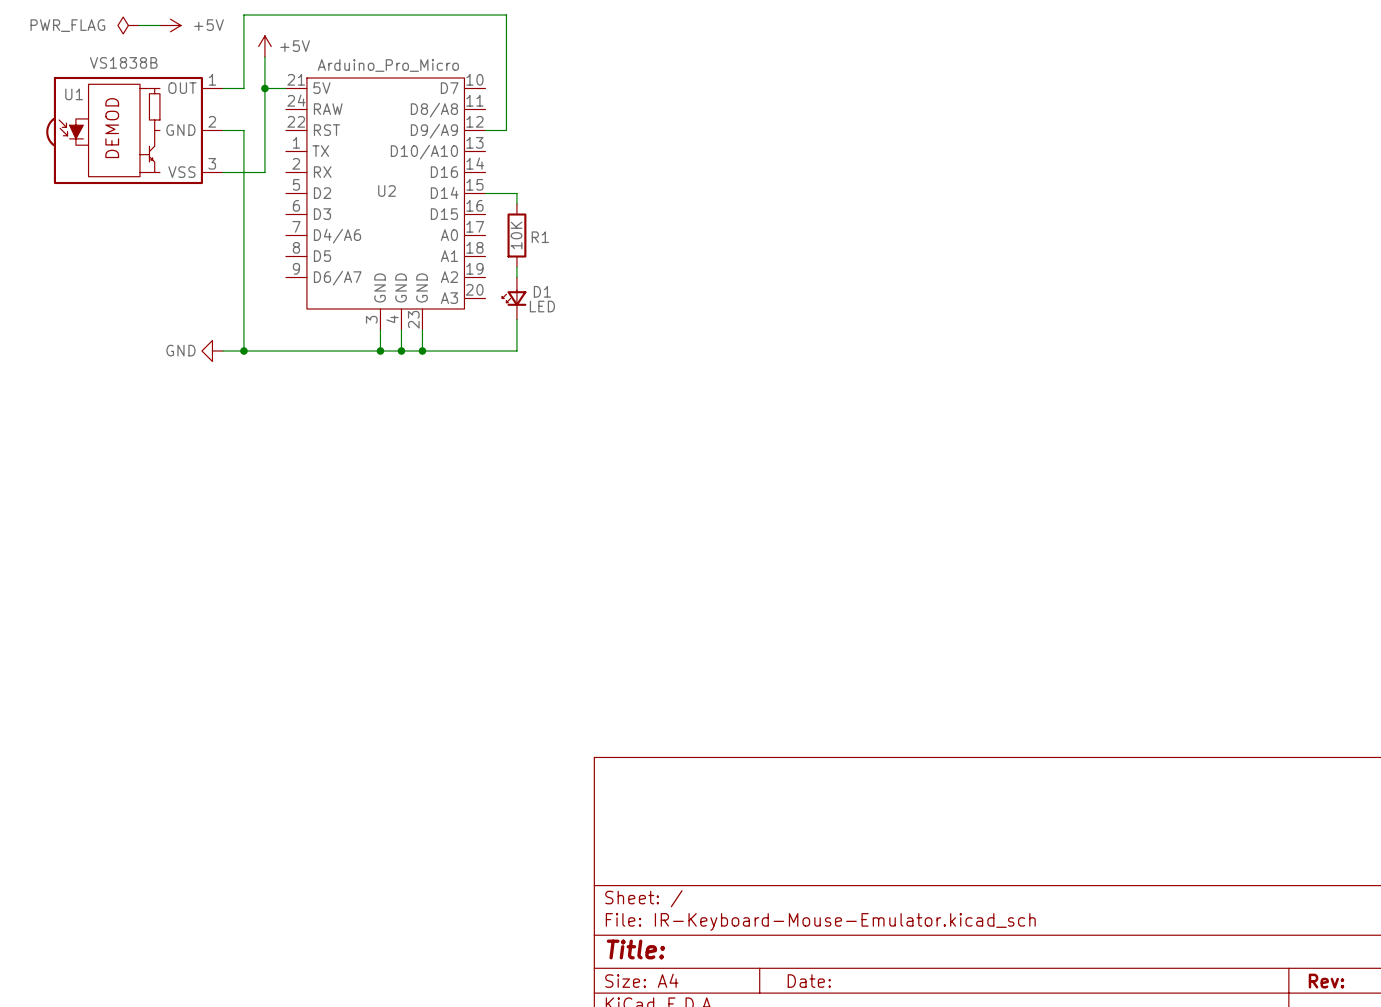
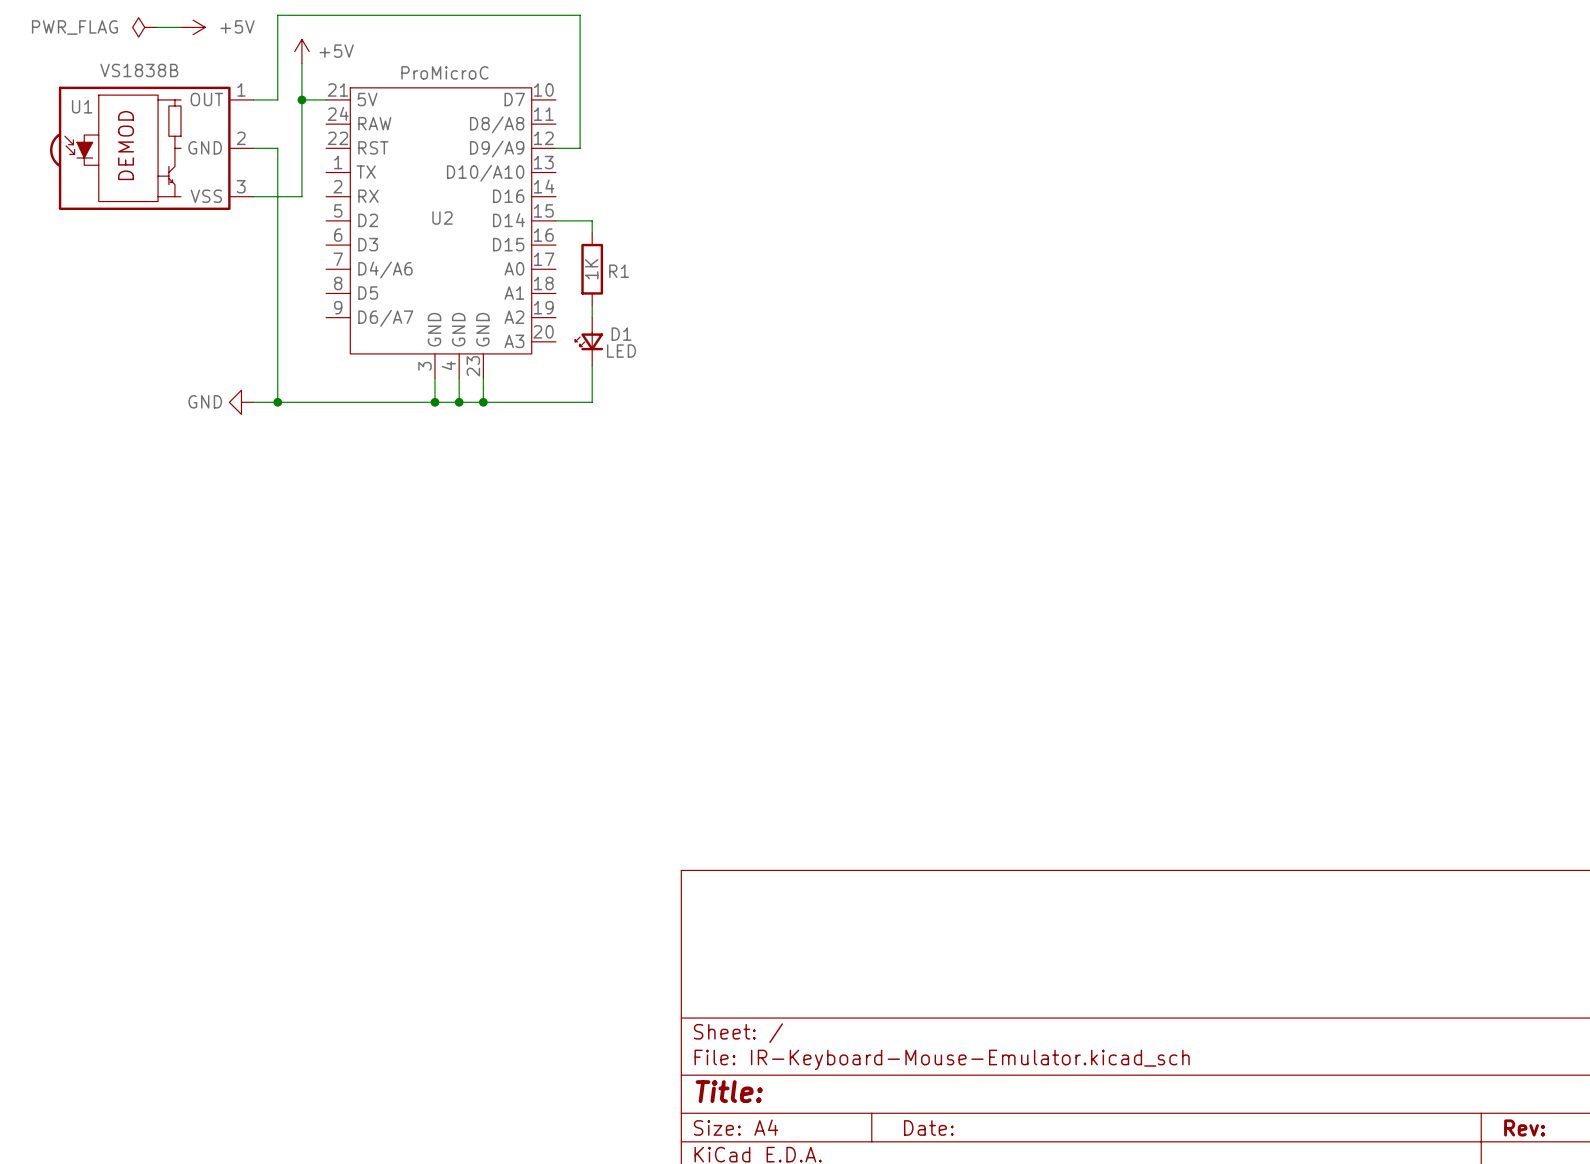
U2 value: Arduino_Pro_Micro (388, 65) -> ProMicroC (444, 72)
R1 value: 10K (516, 235) -> 1K (591, 269)

